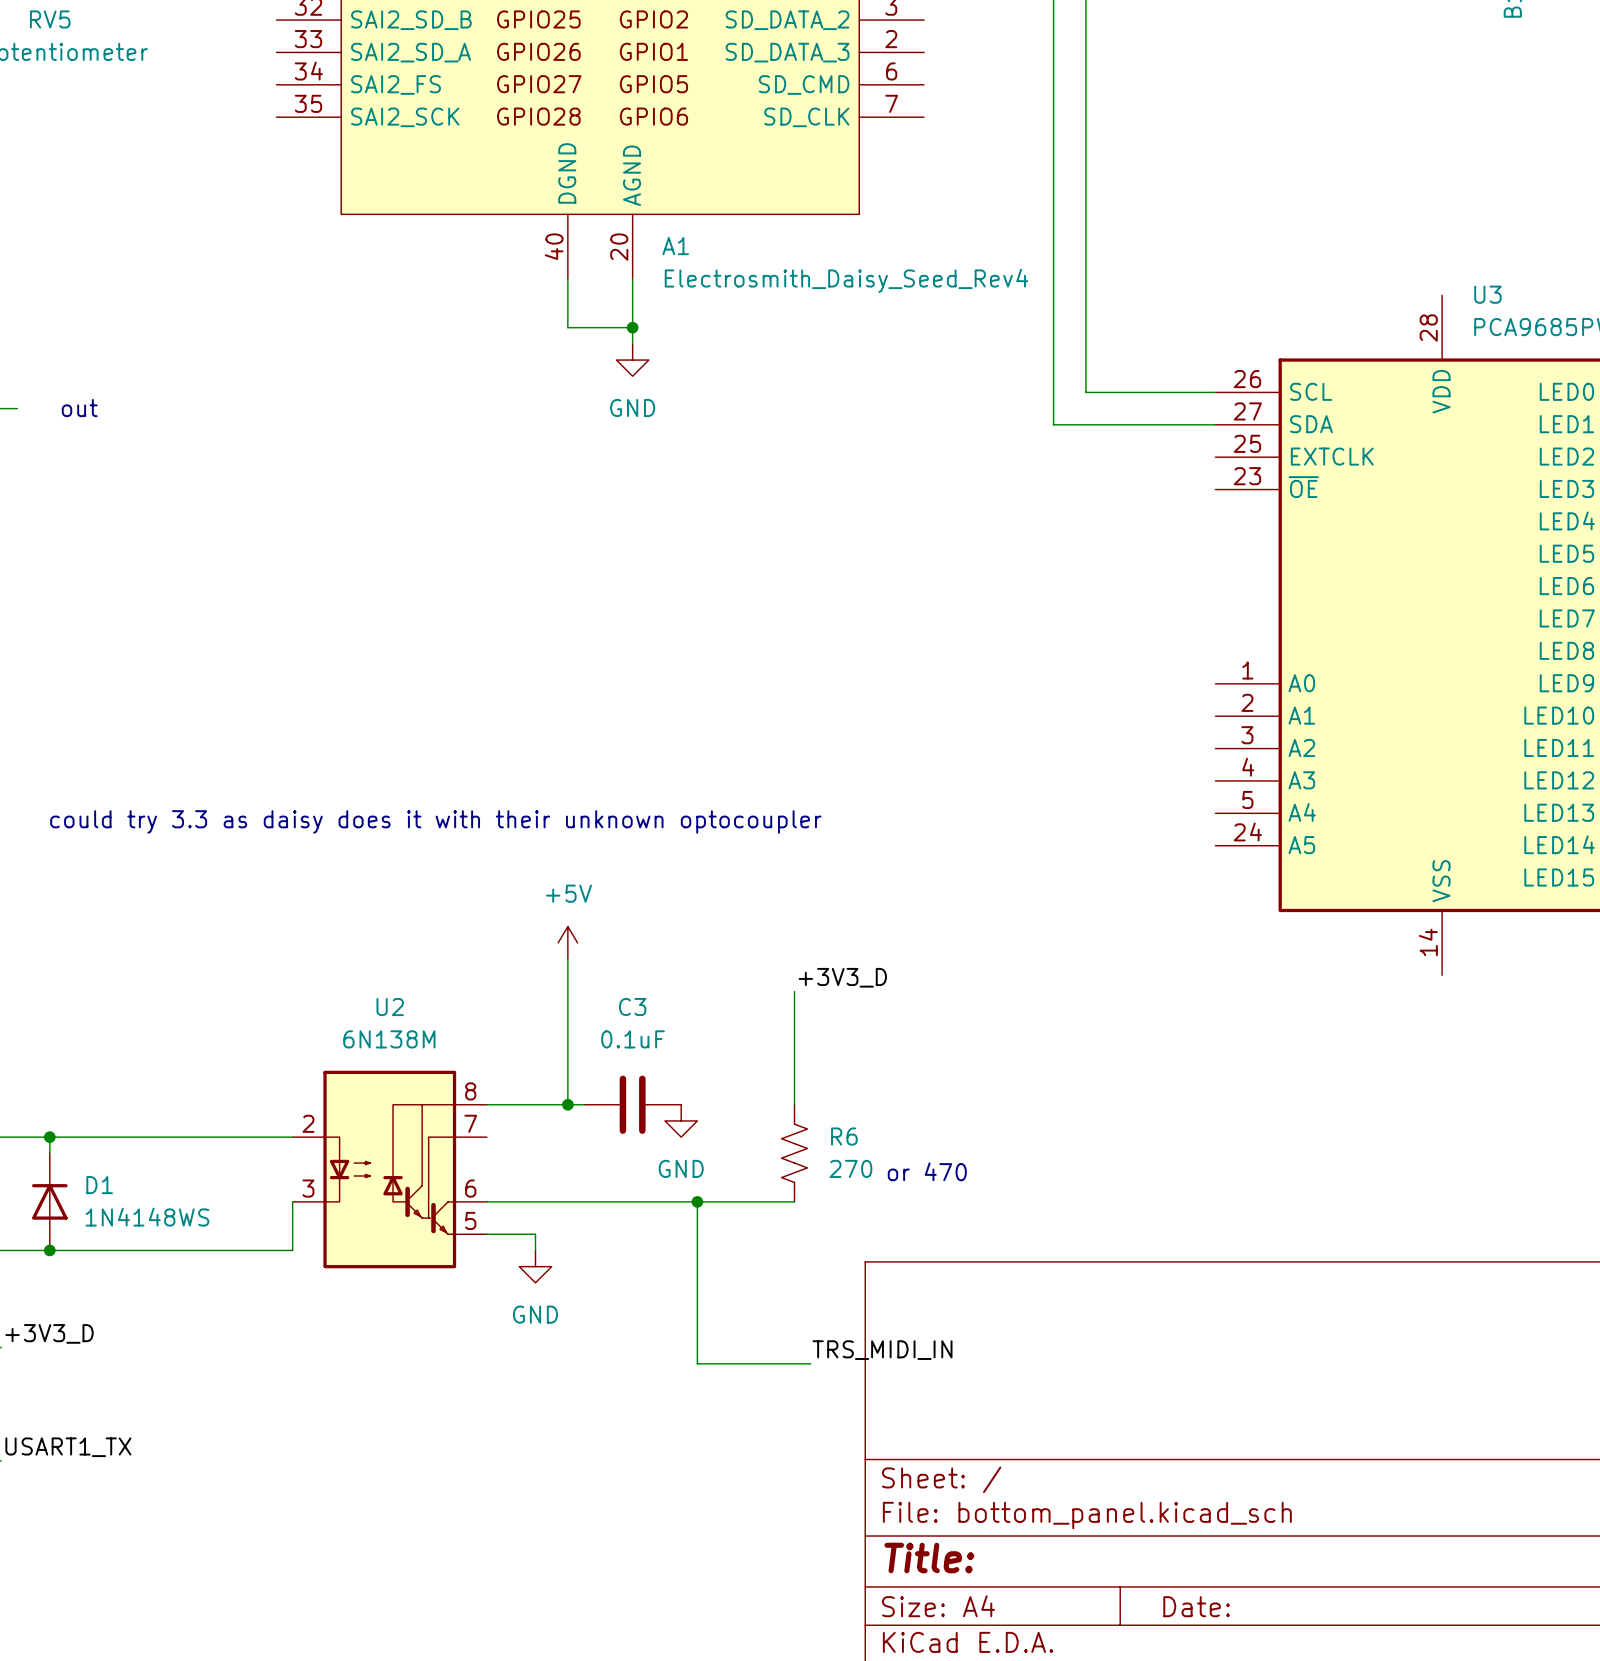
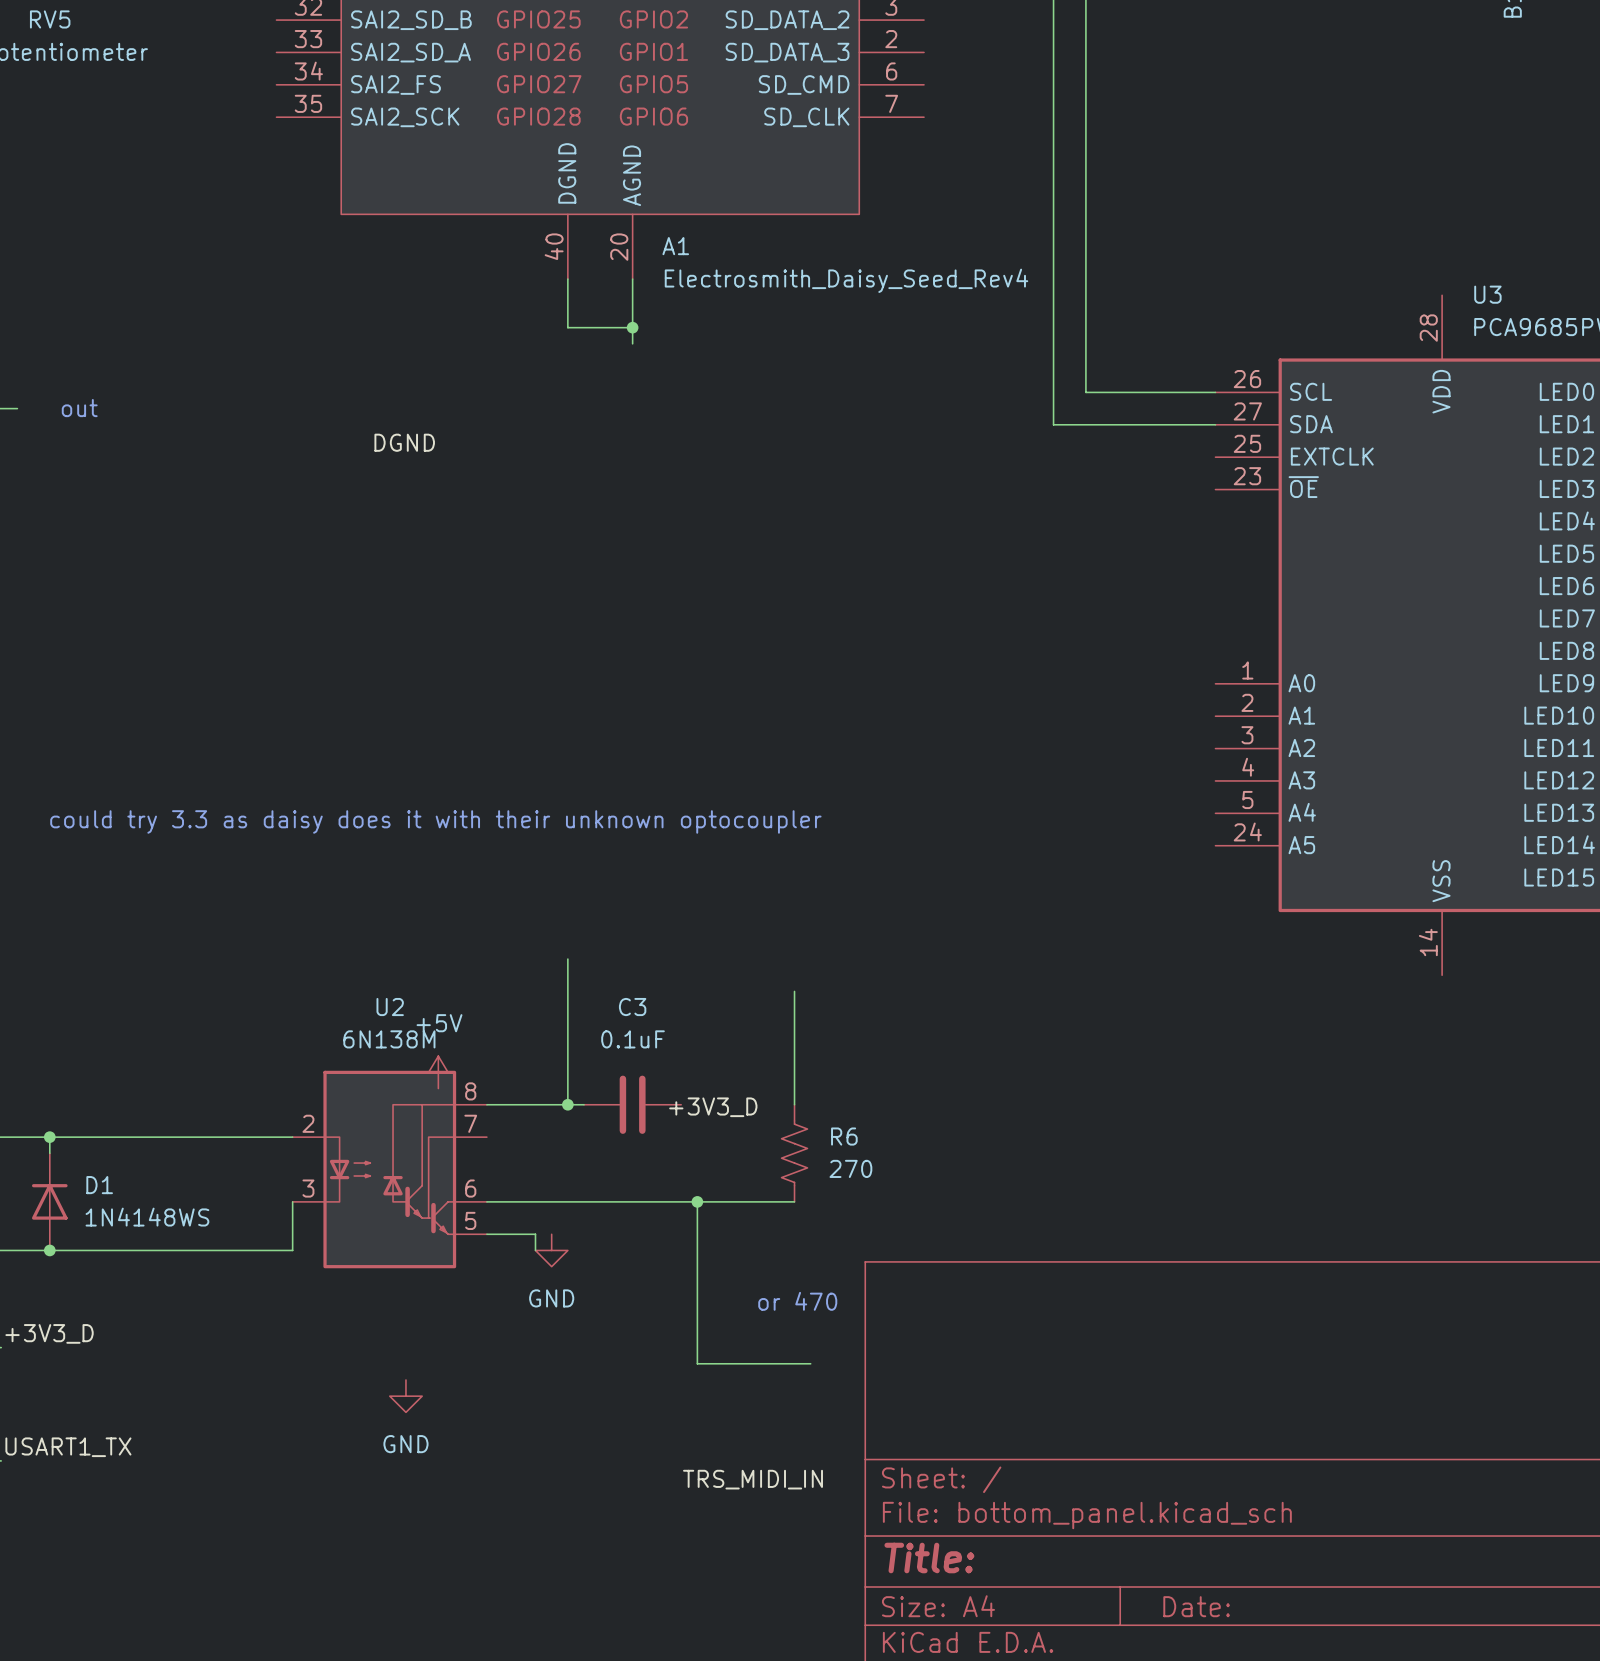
power symbol: GND (632, 360) -> none
label: none -> DGND (404, 442)
power symbol position: +5V (567, 942) -> +5V (438, 1072)
label position: +3V3_D (842, 977) -> +3V3_D (713, 1107)
power symbol: GND (681, 1120) -> none
text position: or 470 (927, 1171) -> or 470 (797, 1301)
power symbol position: GND (535, 1266) -> GND (551, 1250)
label position: TRS_MIDI_IN (882, 1350) -> TRS_MIDI_IN (753, 1479)
power symbol: none -> GND (405, 1396)

